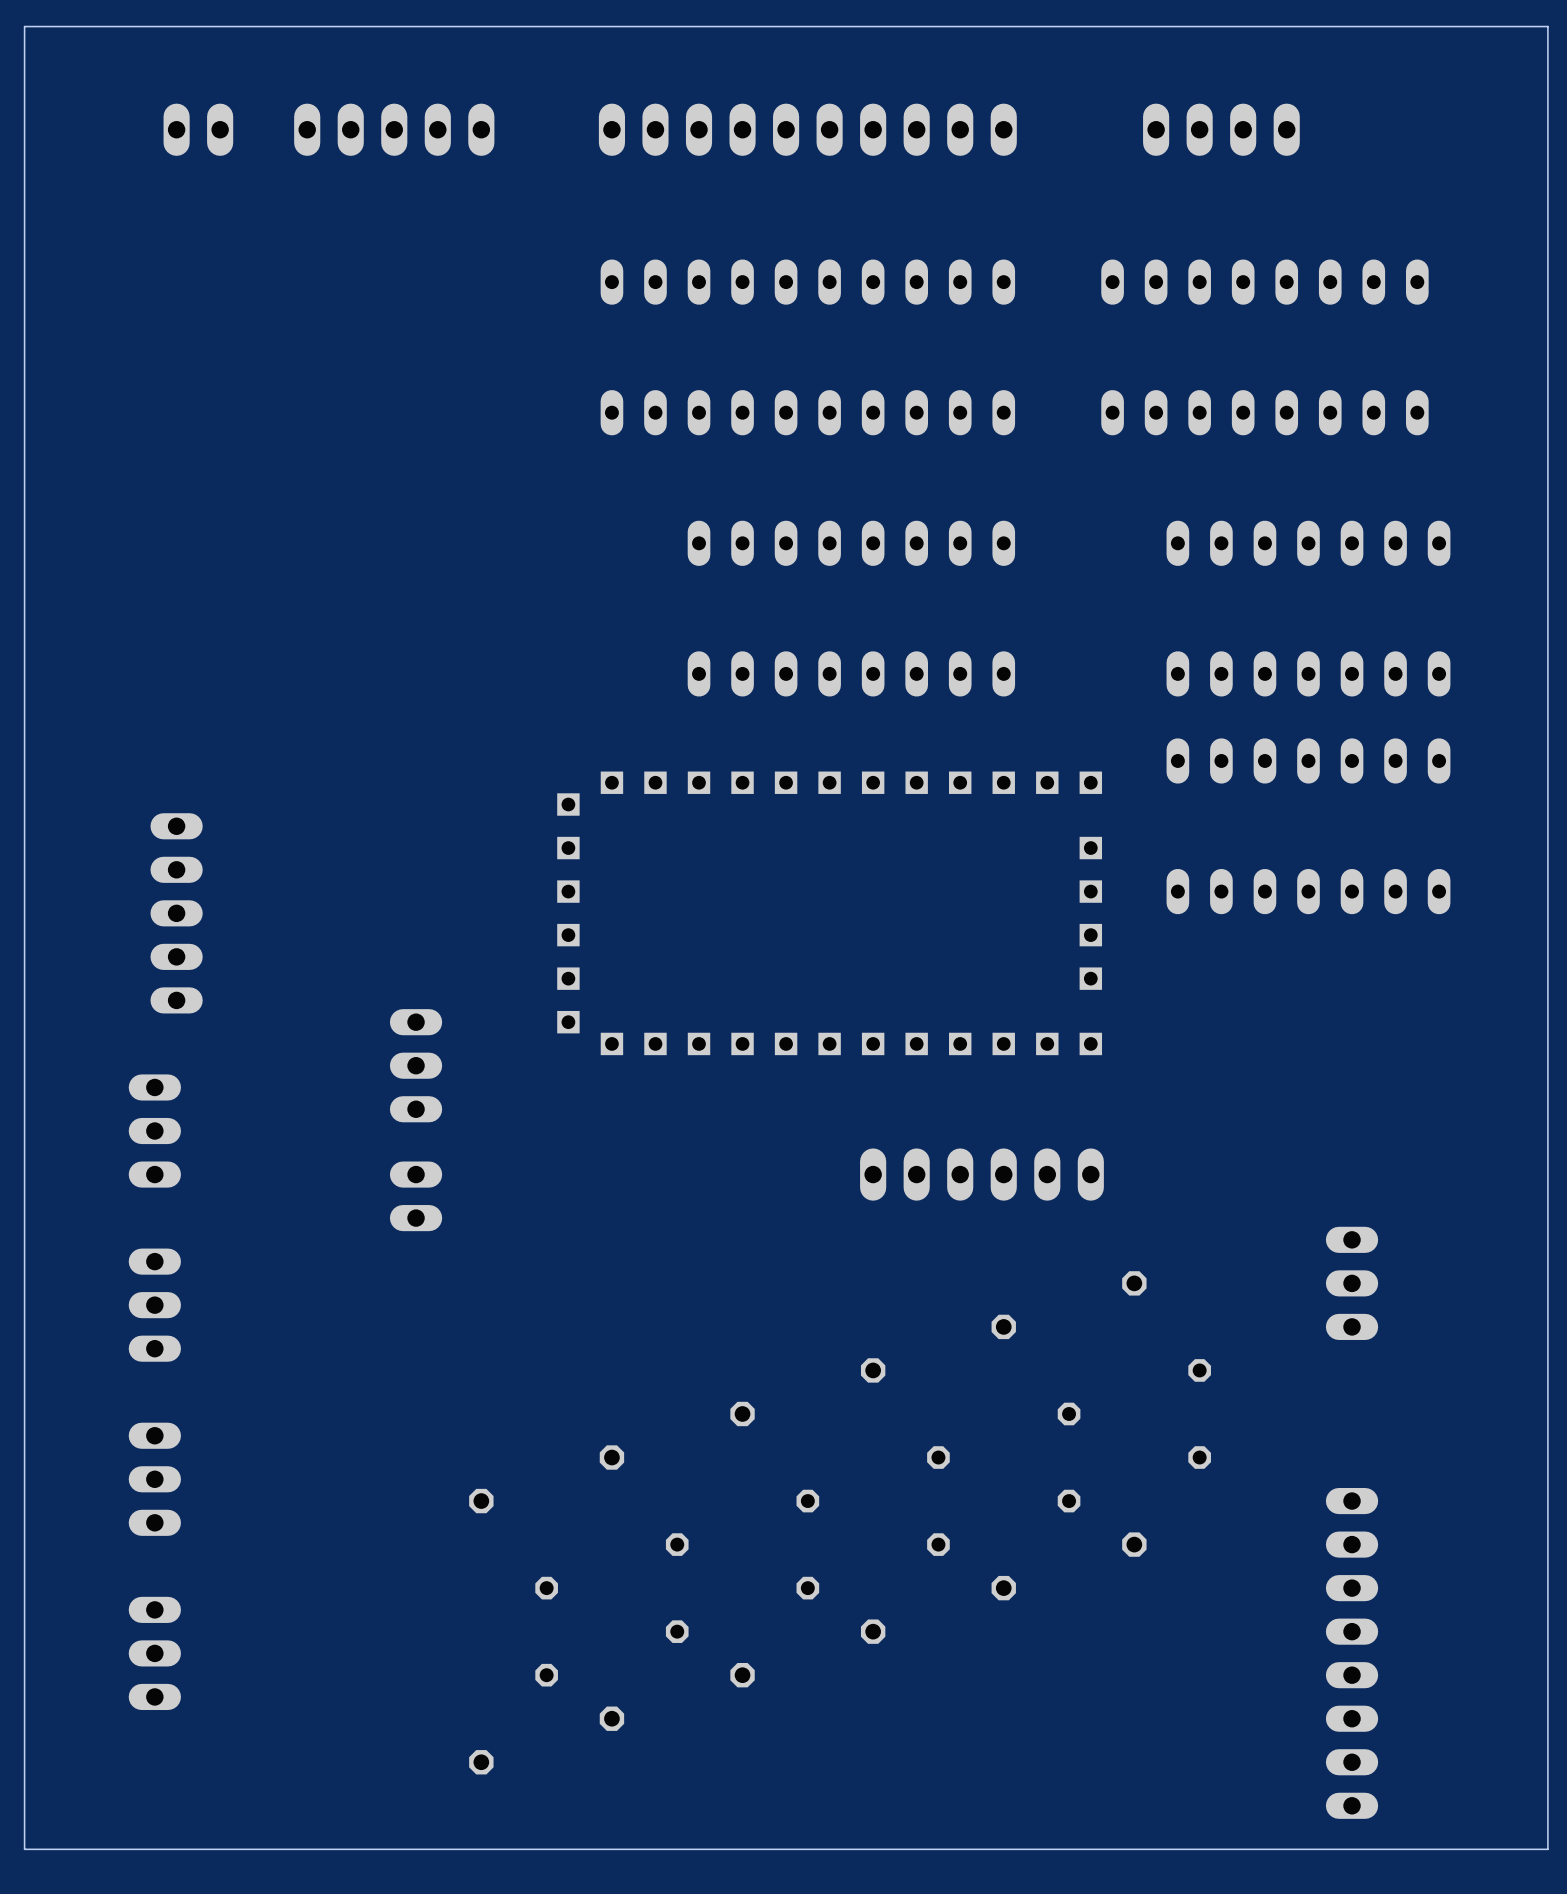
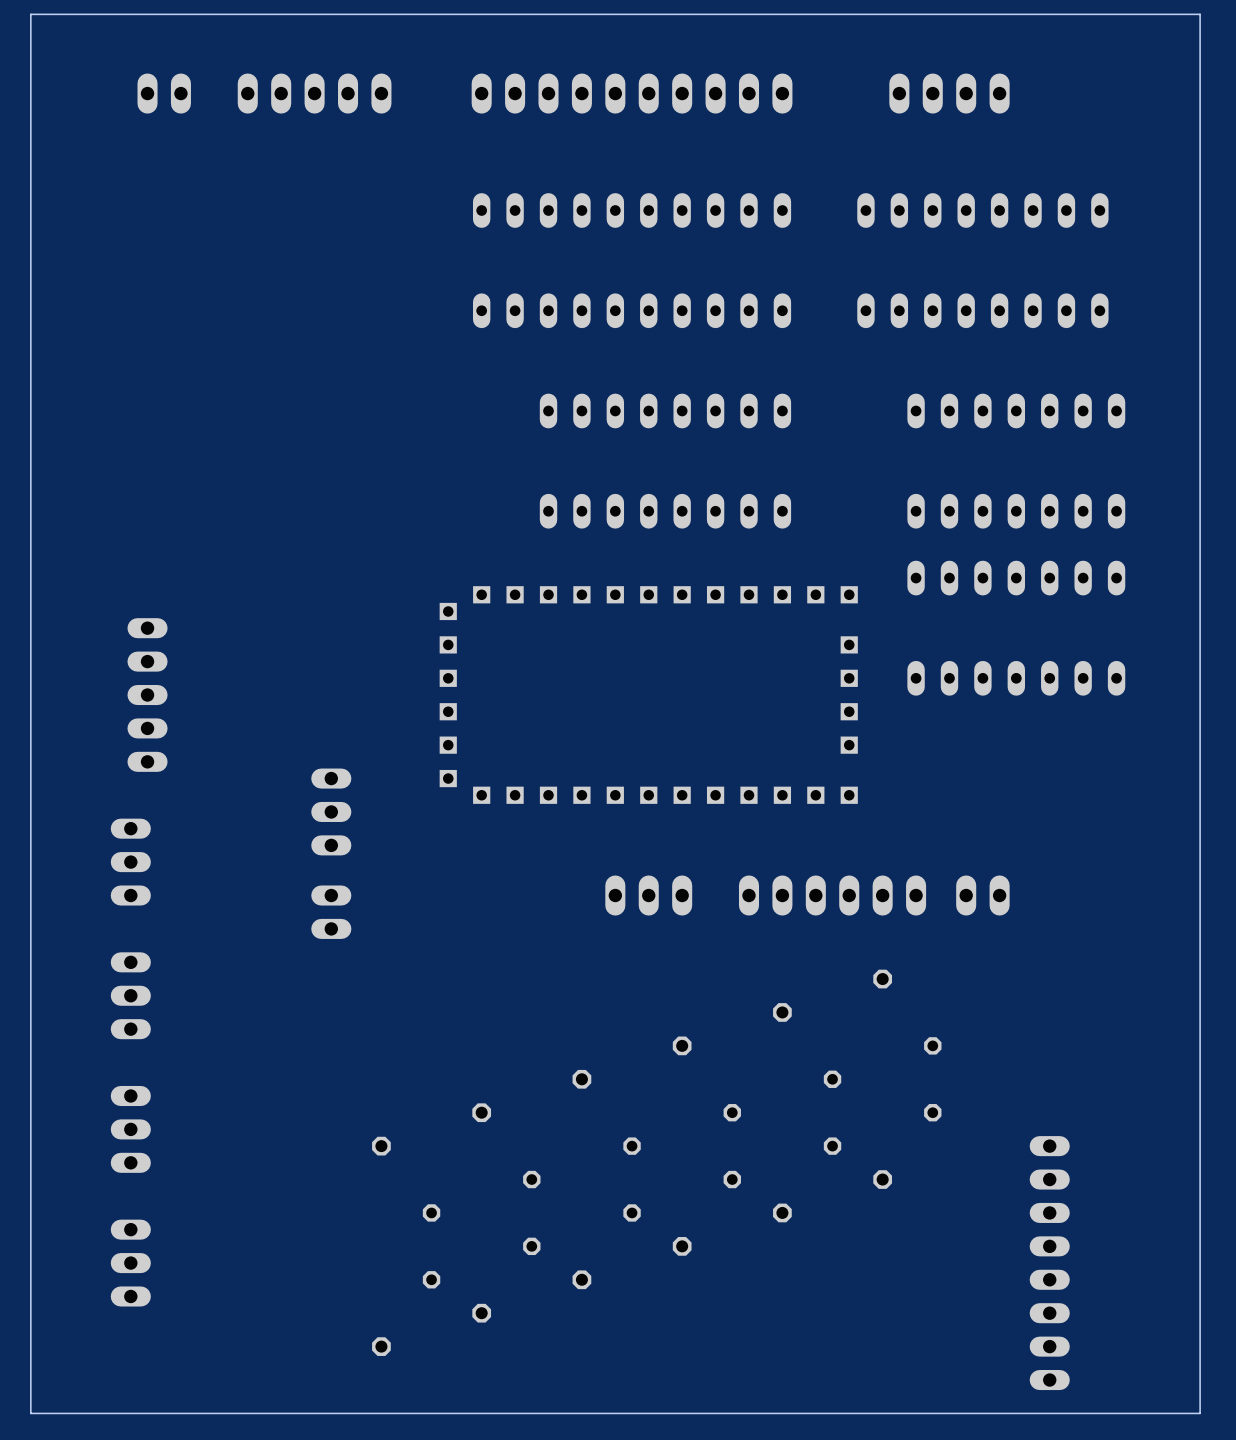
part: none -> (648, 895)
part position: (981, 1174) -> (832, 895)
part: none -> (982, 895)
part: (1352, 1283) -> none

